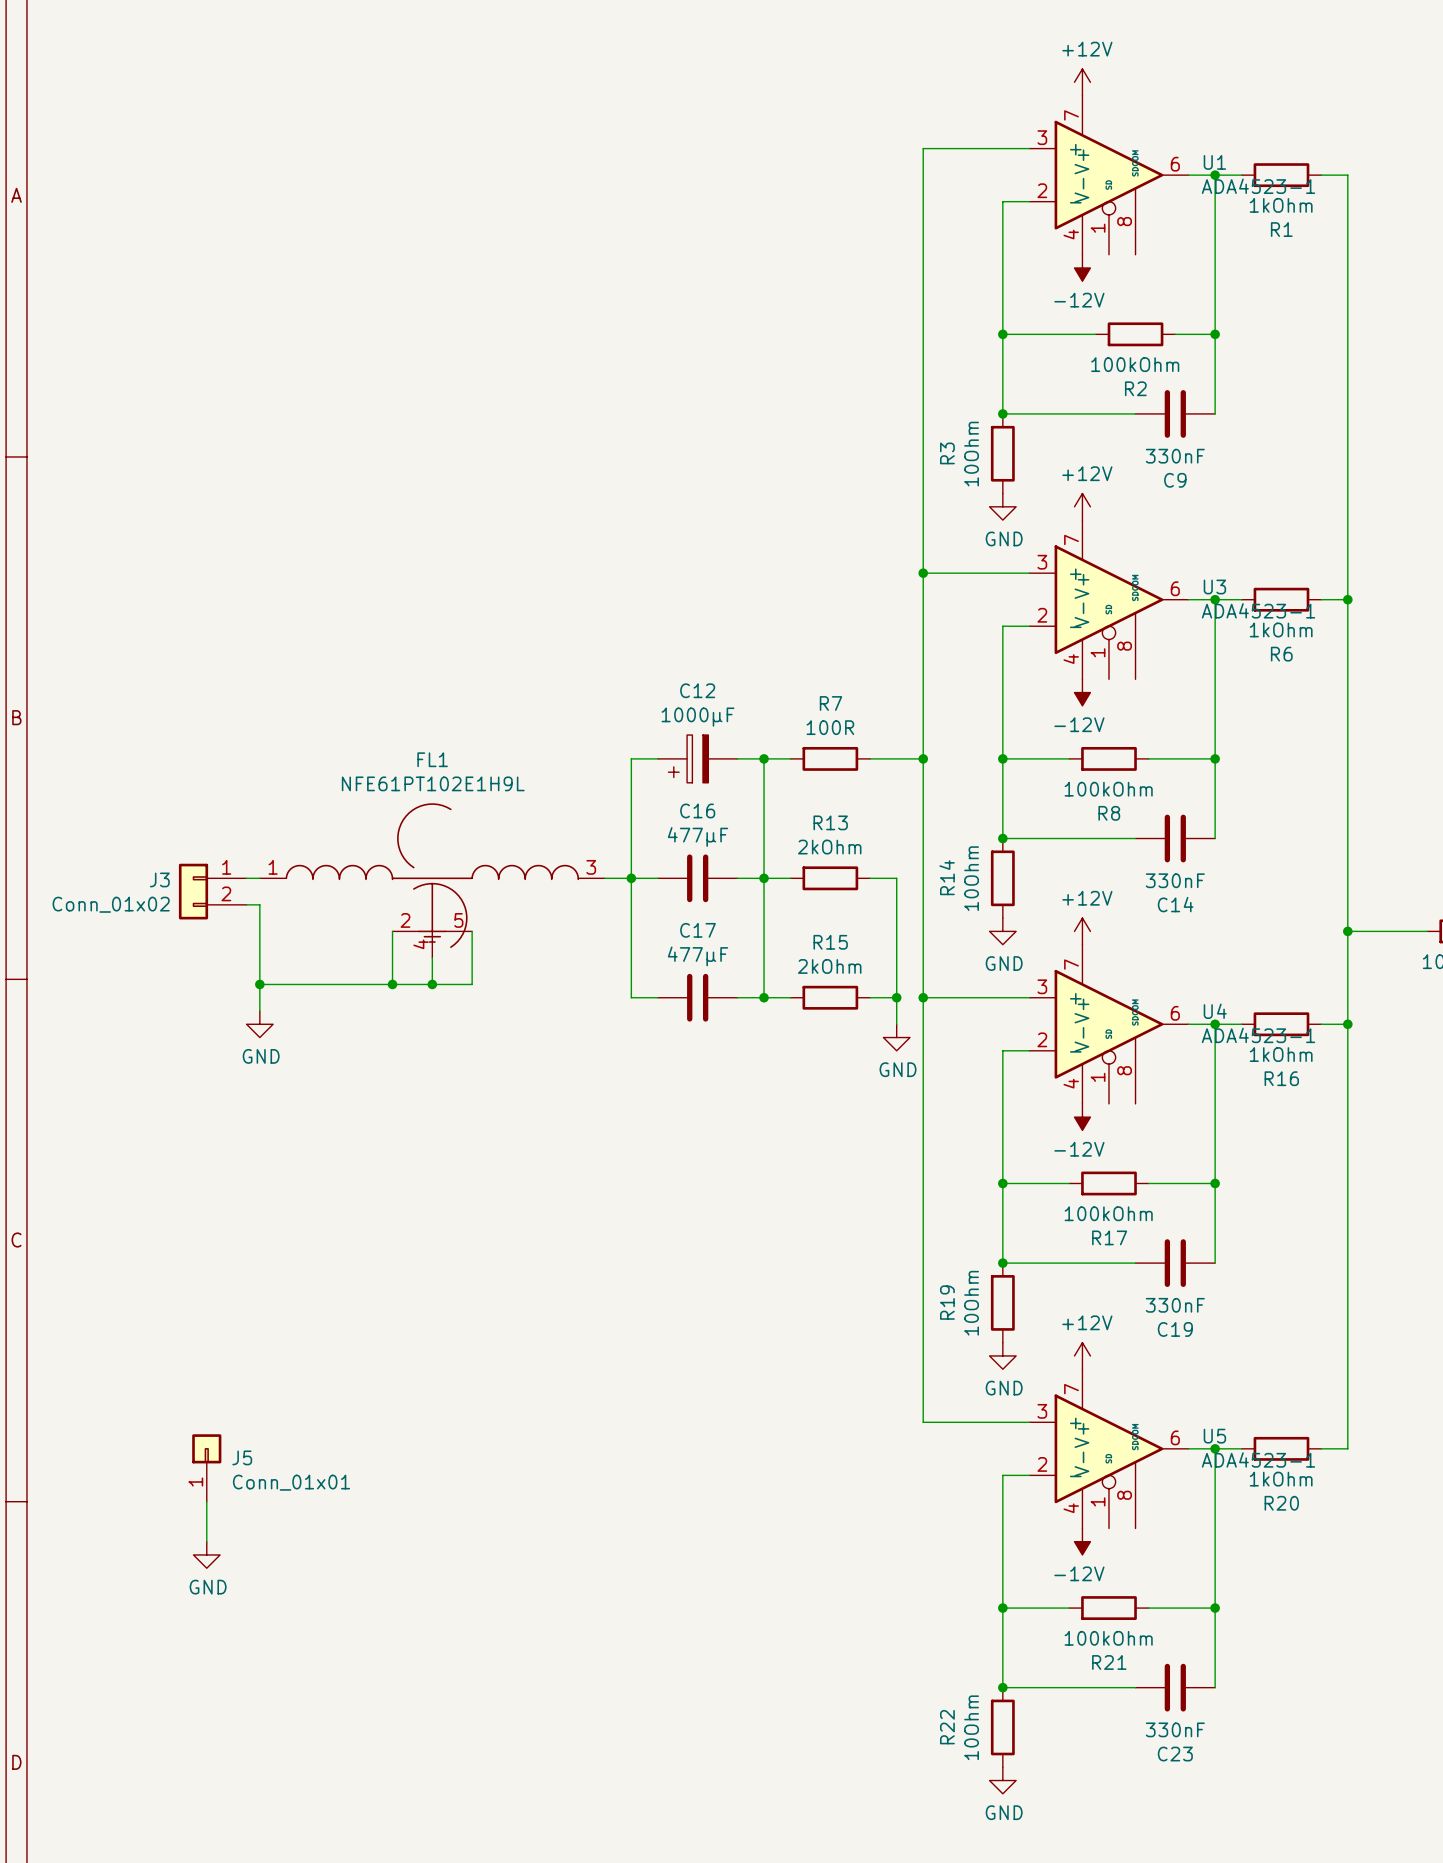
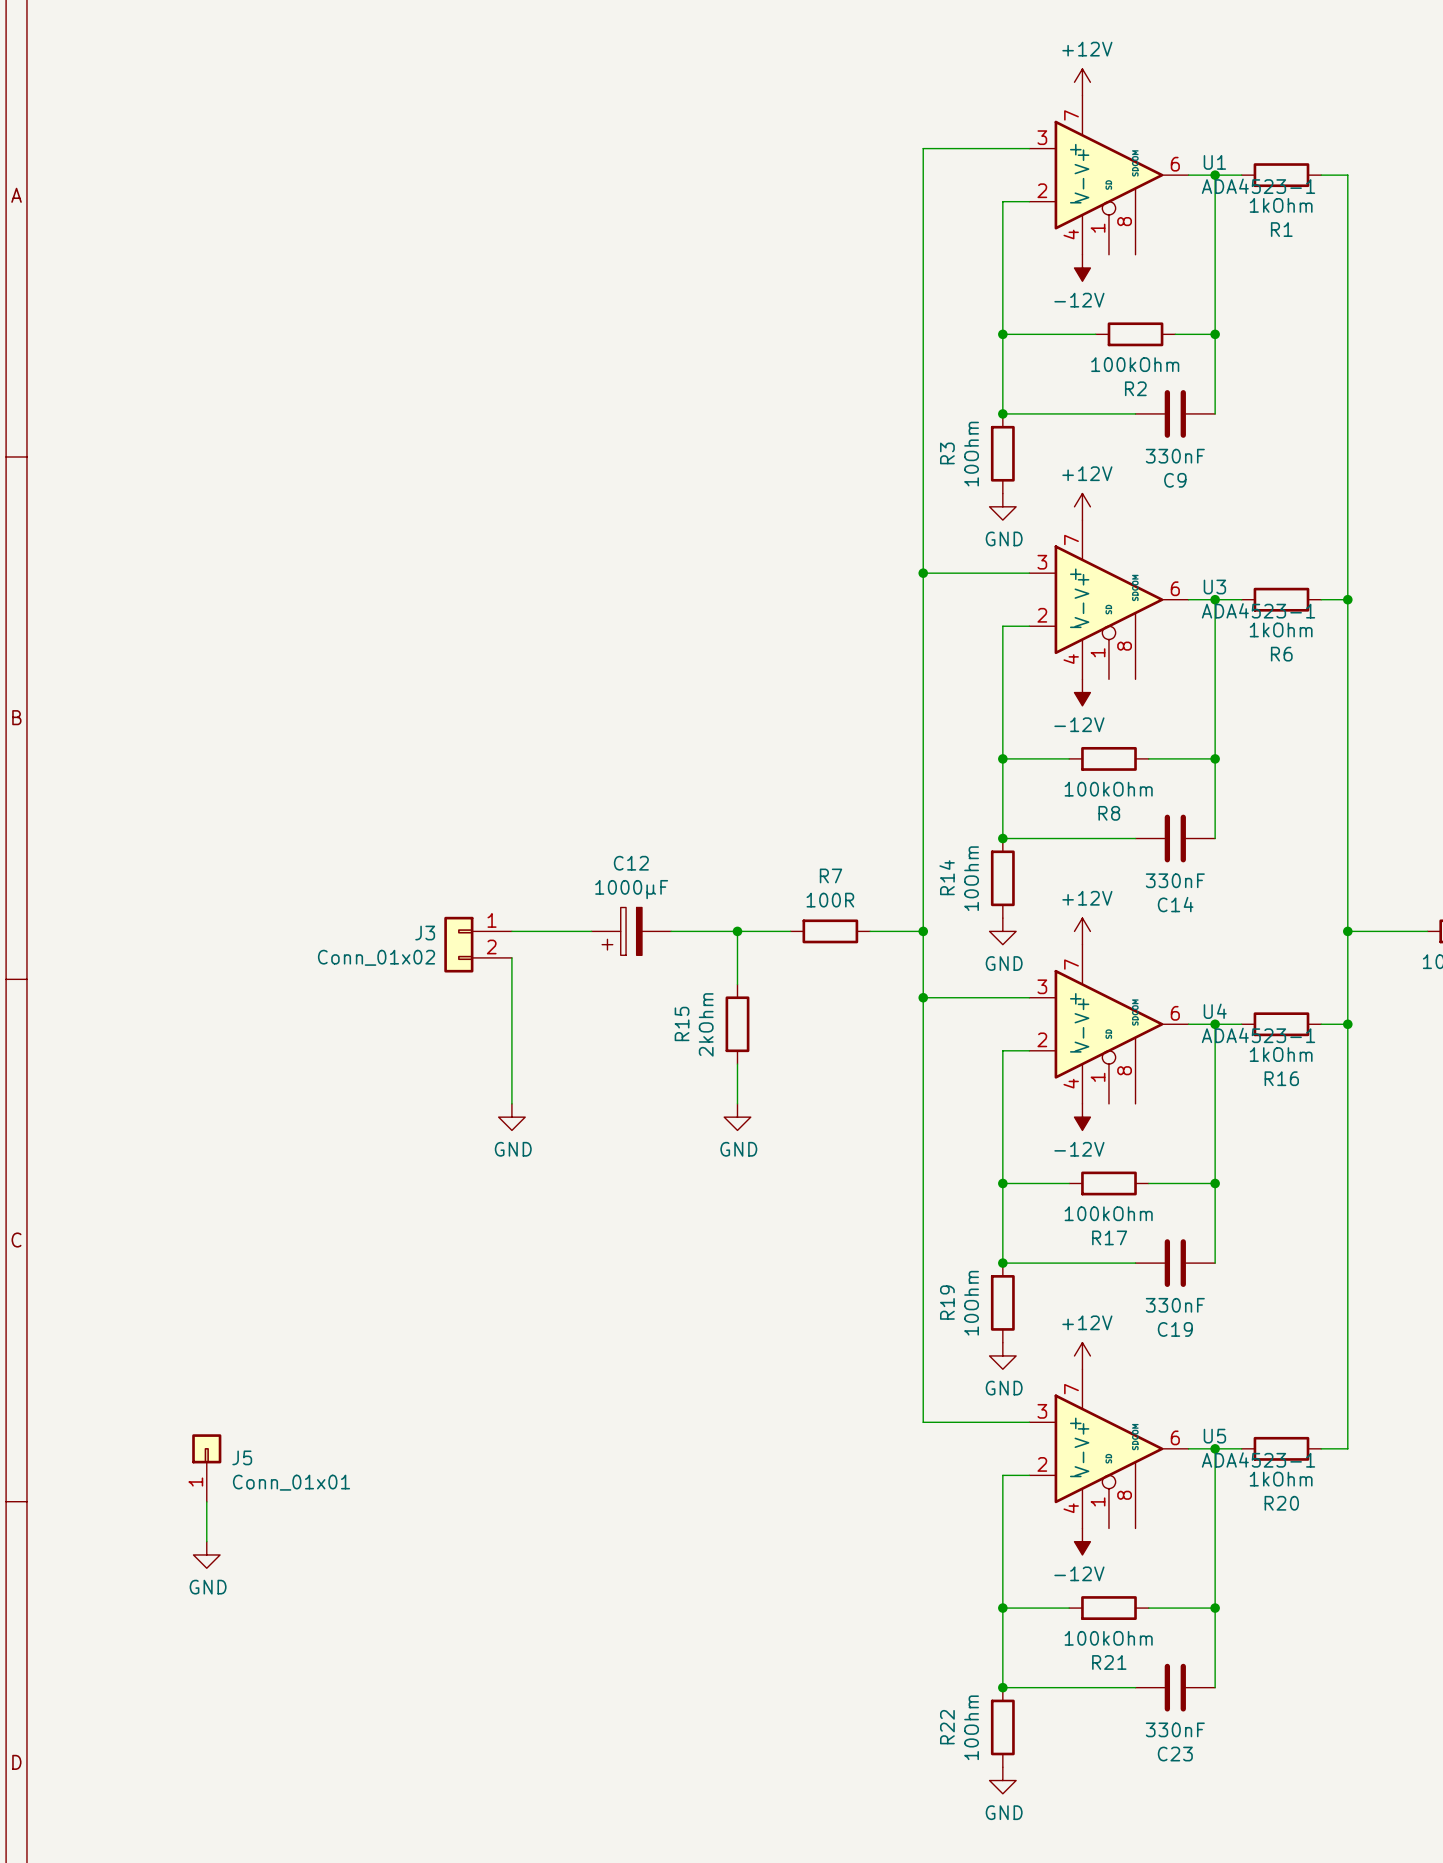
wire: (657, 758) (631, 758) (631, 997) (657, 997) -> none
C12 position: (697, 758) -> (631, 931)
wire: (737, 758) (790, 758) -> none
wire: (764, 758) (764, 997) -> none
junction: (764, 758) -> none
R7 position: (830, 758) -> (830, 931)
wire: (870, 758) (923, 758) -> none
junction: (923, 758) -> none
wire: (246, 878) (259, 878) -> none
wire: (604, 878) (657, 878) -> none
junction: (631, 878) -> none
C16: 477µF (697, 878) -> none
wire: (737, 878) (790, 878) -> (870, 931) (923, 931)
junction: (764, 878) -> none
R13: 2kOhm (830, 878) -> none
wire: (870, 878) (896, 878) (896, 1024) -> none
FL1: NFE61PT102E1H9L (432, 880) -> none
J3 position: (212, 891) -> (478, 944)
wire: (246, 904) (259, 904) (259, 1011) -> none
wire: (392, 931) (392, 984) -> none
wire: (472, 931) (472, 984) (259, 984) -> none
wire: none -> (511, 931) (591, 931)
wire: none -> (671, 931) (790, 931)
wire: none -> (737, 931) (737, 984)
junction: none -> (737, 931)
junction: none -> (923, 931)
R15 name position: R15 (830, 942) -> R15 (682, 1023)
wire: (432, 957) (432, 984) -> none
wire: none -> (511, 957) (511, 1103)
R15 value position: 2kOhm (829, 966) -> 2kOhm (706, 1024)
junction: (259, 984) -> none
junction: (392, 984) -> none
junction: (432, 984) -> none
C17: 477µF (697, 997) -> none
wire: (737, 997) (790, 997) -> none
junction: (764, 997) -> none
R15 rotation: 0° (830, 997) -> 90° clockwise (737, 1024)
R15 position: (830, 997) -> (737, 1024)
wire: (870, 997) (896, 997) -> none
junction: (896, 997) -> none
power symbol: GND (259, 1024) -> none
power symbol position: GND (896, 1037) -> GND (737, 1117)
wire: none -> (737, 1064) (737, 1103)
power symbol: none -> GND (511, 1117)

